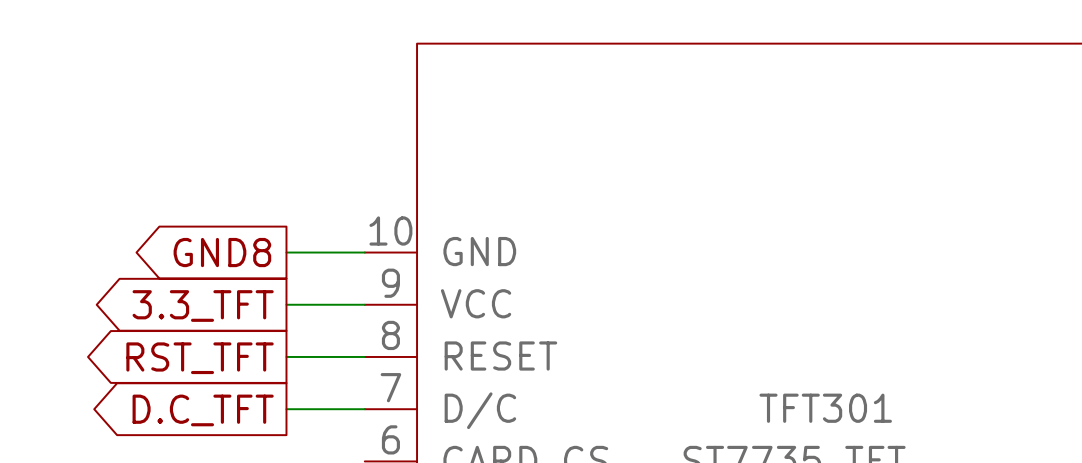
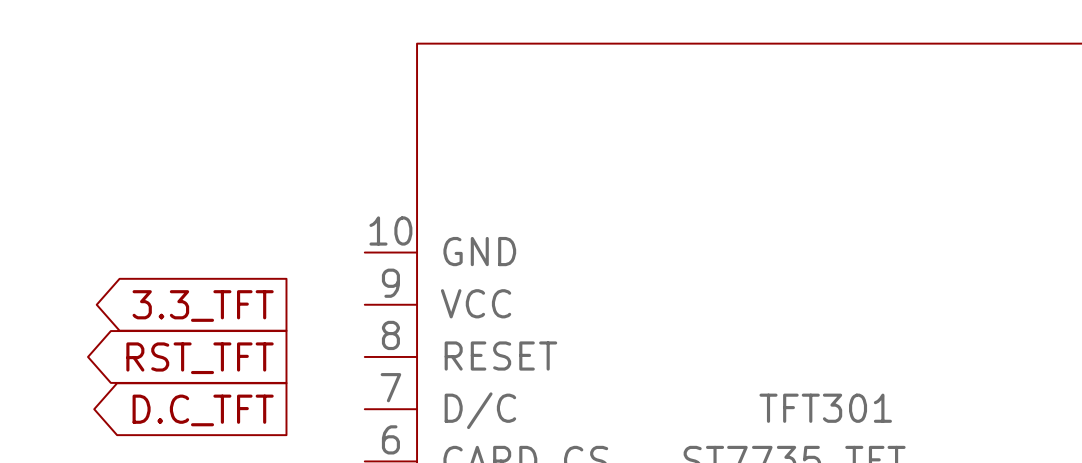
global label: GND8 (222, 252) -> none
wire: (286, 252) (364, 252) -> none
wire: (286, 304) (364, 304) -> none
wire: (286, 356) (364, 356) -> none
wire: (286, 409) (364, 409) -> none

